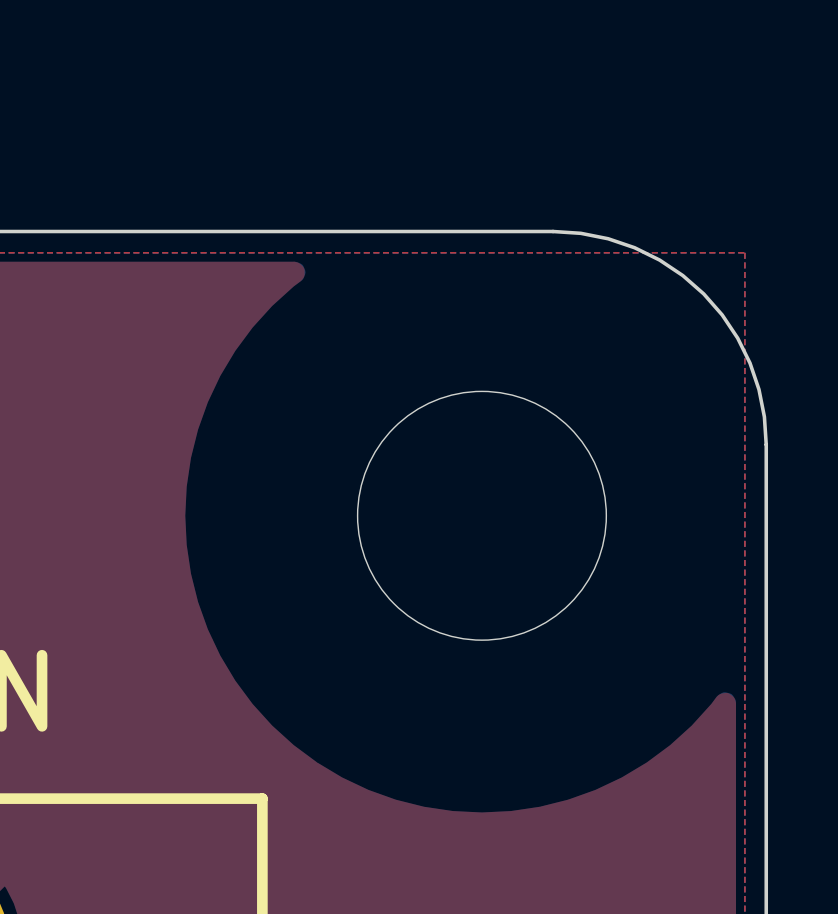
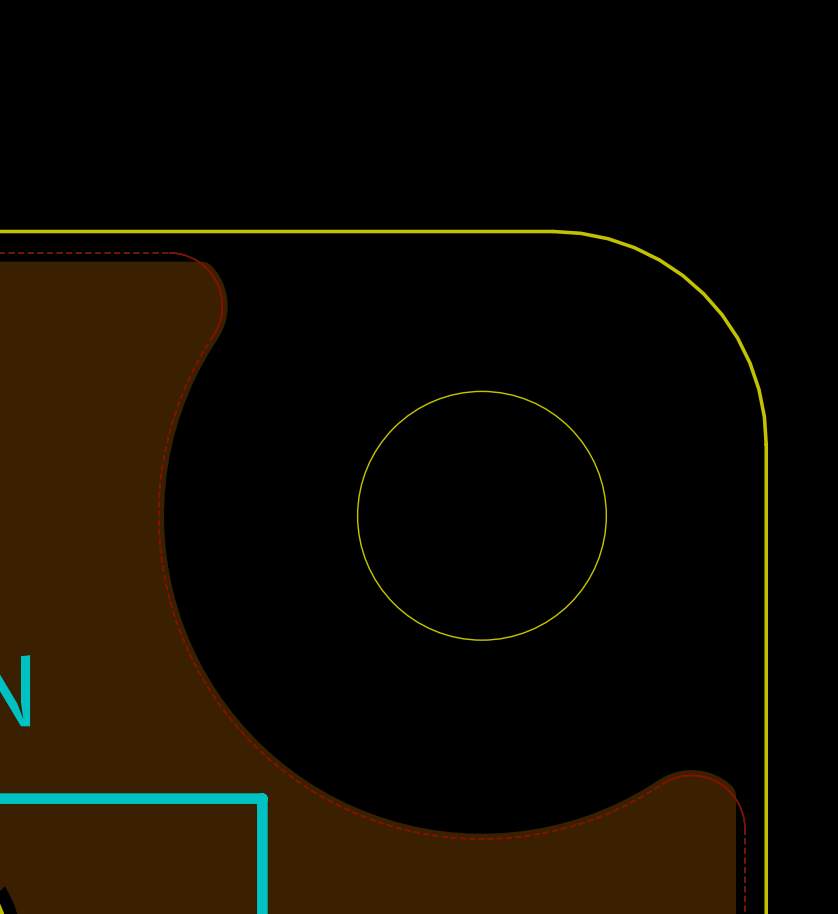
top zone outline: (169, 252) (744, 252) (744, 828) -> (169, 252) (191, 257) (205, 267) (218, 286) (222, 308) (216, 330) (186, 384) (168, 436) (159, 491) (158, 528) (162, 565) (175, 619) (198, 670) (228, 716) (253, 744) (280, 769) (327, 799) (378, 822) (432, 835) (468, 838) (506, 838) (560, 829) (613, 811) (666, 781) (688, 775) (711, 779) (730, 792) (740, 806) (744, 828)

